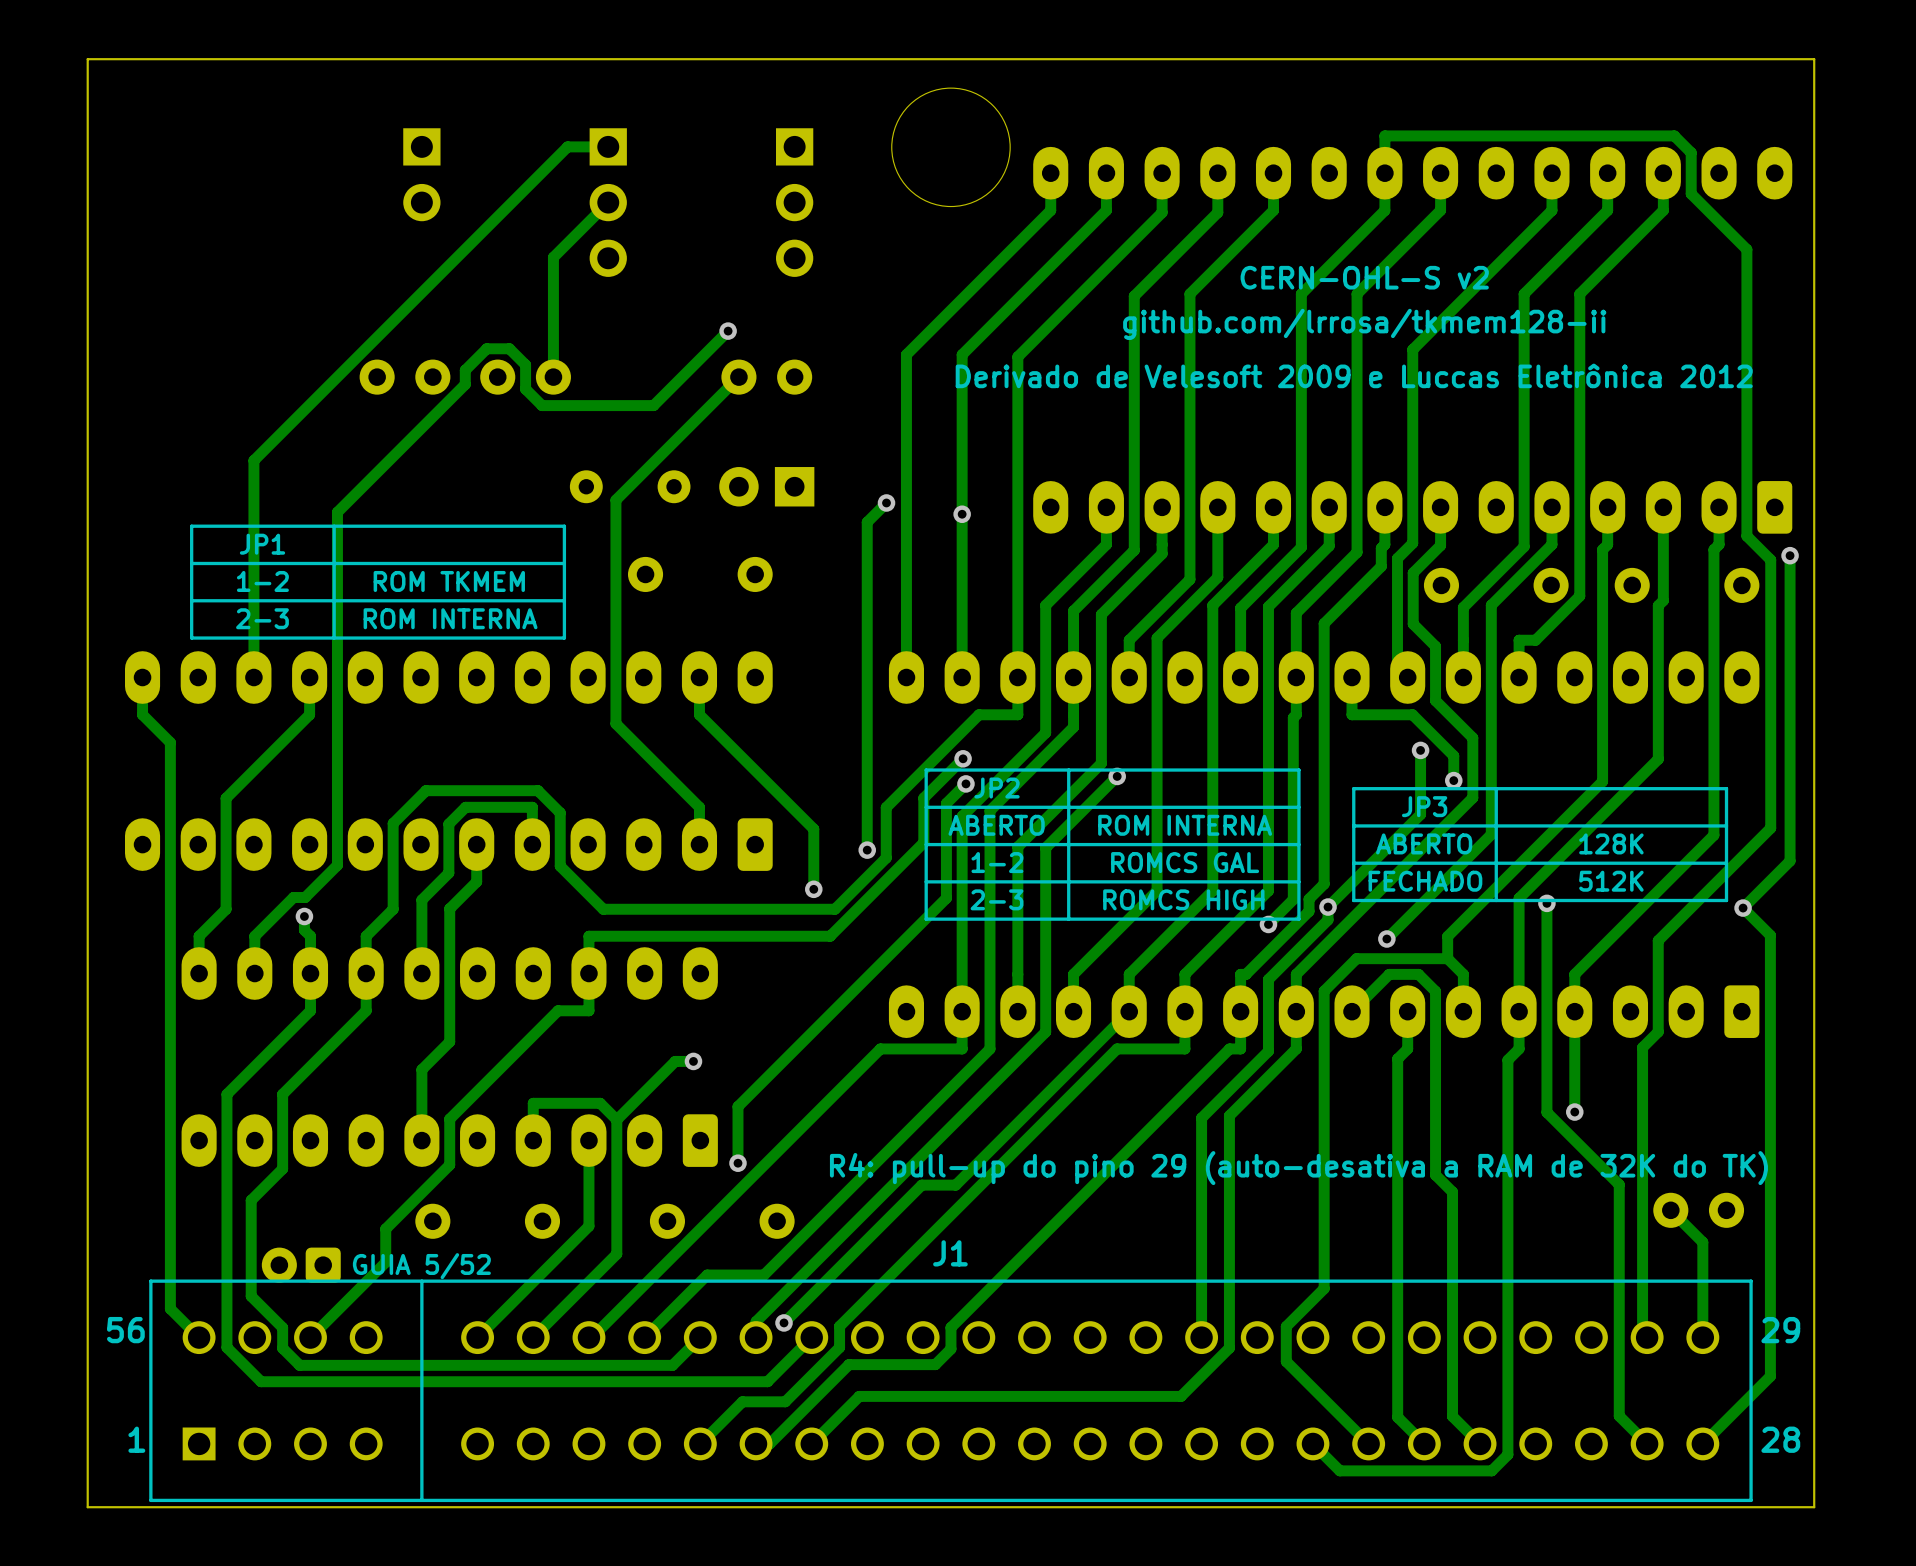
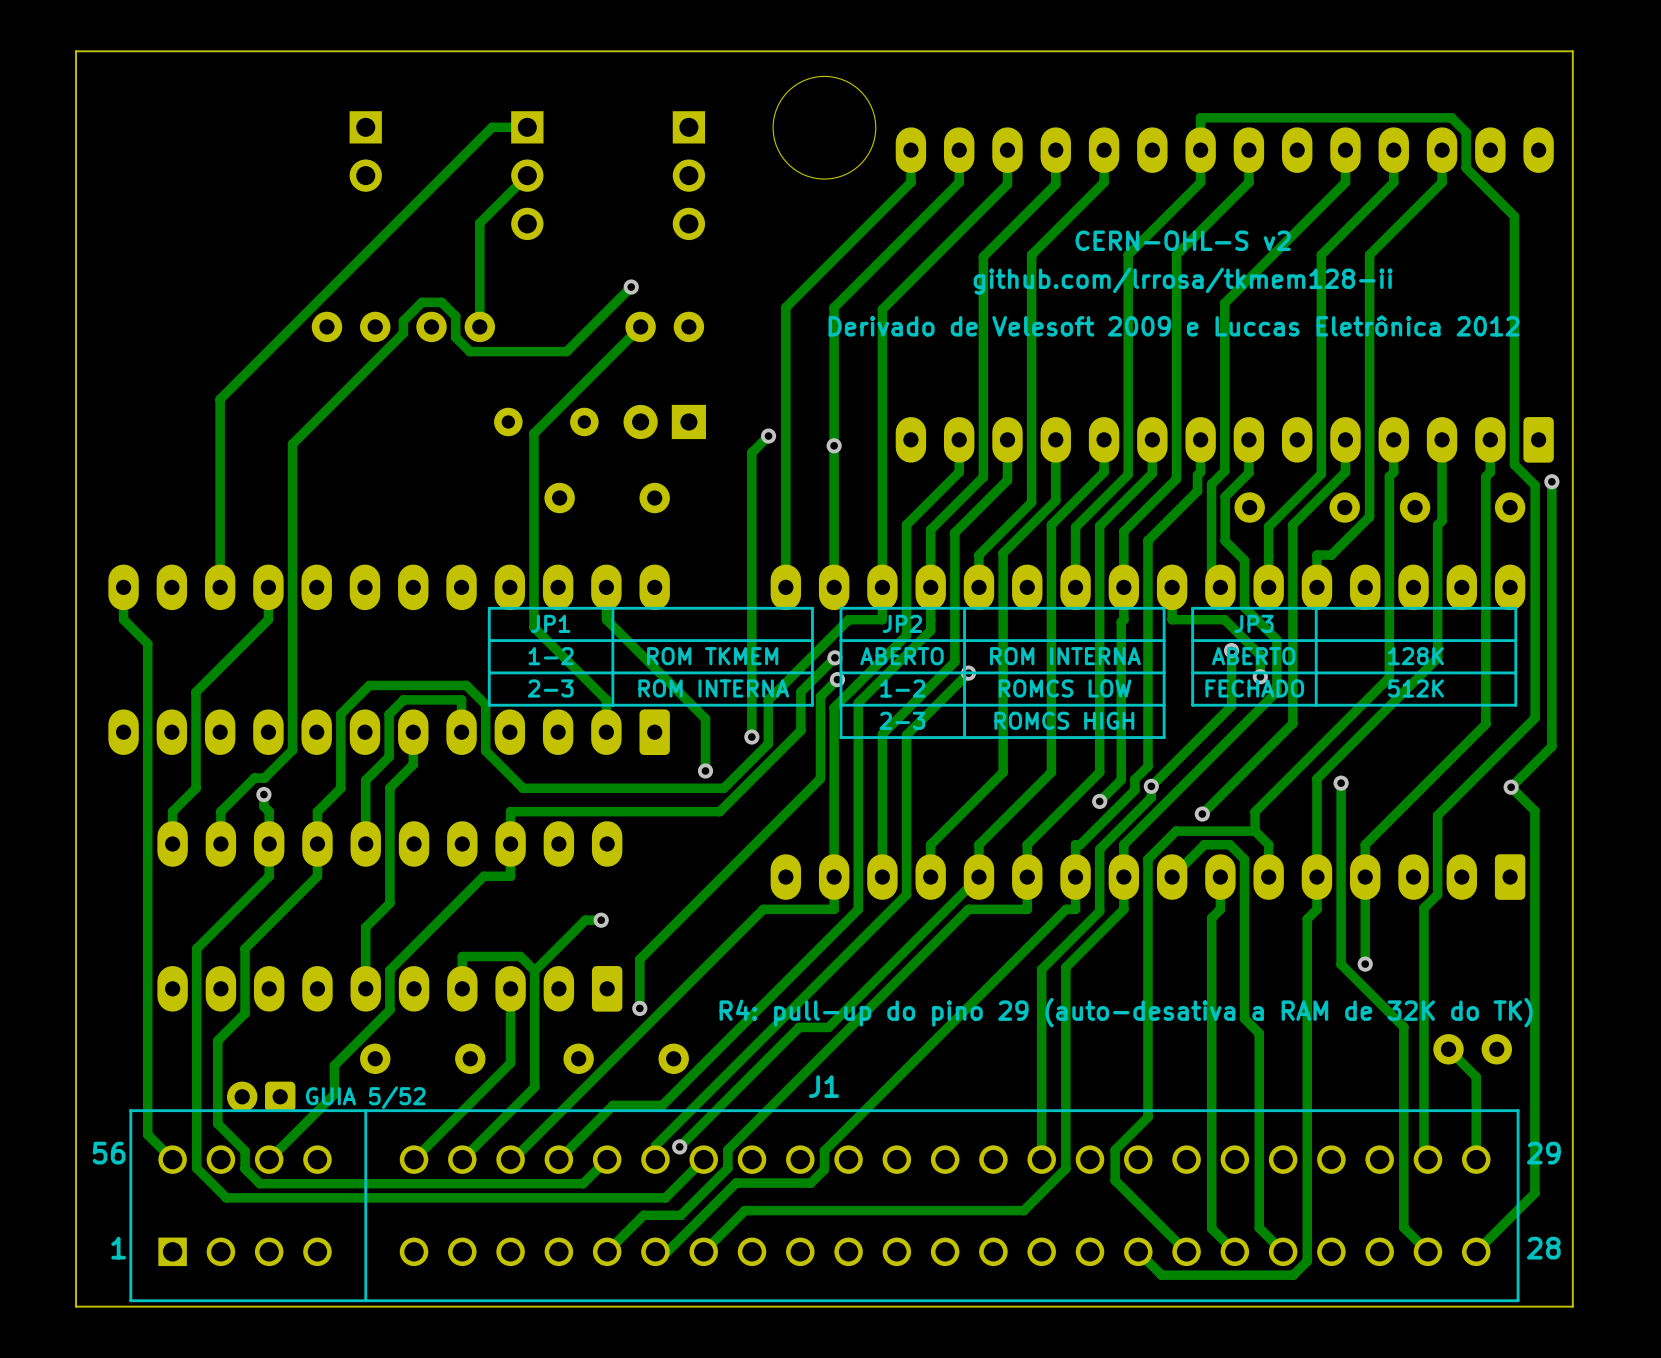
line: (334, 526) (334, 638) -> (612, 608) (612, 705)
line: (564, 526) (564, 638) (191, 638) (191, 526) (564, 526) -> (812, 608) (812, 705) (489, 705) (489, 608) (812, 608)
text position: JP1 (262, 544) -> JP1 (550, 623)
line: (564, 563) (191, 563) -> (812, 640) (489, 640)
text: 1-2 (262, 581) -> none
text position: ROM TKMEM (449, 581) -> ROM TKMEM (712, 656)
line: (564, 600) (191, 600) -> (812, 672) (489, 672)
text: 2-3 (262, 618) -> none
text: ROM INTERNA (450, 618) -> none
text: none -> 1-2 (551, 656)
line: (1068, 770) (1068, 919) -> (964, 608) (964, 737)
line: (1298, 770) (1298, 919) (926, 919) (926, 770) (1298, 770) -> (1164, 608) (1164, 737) (840, 737) (840, 608) (1164, 608)
text position: JP2 (997, 788) -> JP2 (902, 623)
line: (1496, 788) (1496, 900) -> (1316, 608) (1316, 705)
line: (1726, 788) (1726, 900) (1353, 900) (1353, 788) (1726, 788) -> (1515, 608) (1515, 705) (1192, 705) (1192, 608) (1515, 608)
text: none -> 2-3 (550, 688)
text: none -> ROM INTERNA (713, 688)
text: none -> ROMCS LOW (1065, 688)
text position: JP3 (1424, 806) -> JP3 (1254, 623)
line: (1298, 807) (926, 807) -> (1164, 640) (840, 640)
text position: ABERTO (996, 825) -> ABERTO (902, 656)
text position: ROM INTERNA (1185, 825) -> ROM INTERNA (1065, 656)
line: (1726, 825) (1353, 825) -> (1515, 640) (1192, 640)
text position: ABERTO (1424, 843) -> ABERTO (1253, 656)
text position: 128K (1611, 843) -> 128K (1415, 656)
line: (1298, 844) (926, 844) -> (1164, 672) (840, 672)
text position: 1-2 (997, 862) -> 1-2 (902, 688)
text: ROMCS GAL (1185, 862) -> none
line: (1726, 863) (1353, 863) -> (1515, 672) (1192, 672)
line: (1298, 881) (926, 881) -> (1164, 705) (840, 705)
text position: FECHADO (1425, 881) -> FECHADO (1254, 688)
text position: 512K (1611, 881) -> 512K (1415, 688)
text position: 2-3 (997, 899) -> 2-3 (902, 720)
text position: ROMCS HIGH (1183, 899) -> ROMCS HIGH (1064, 720)

